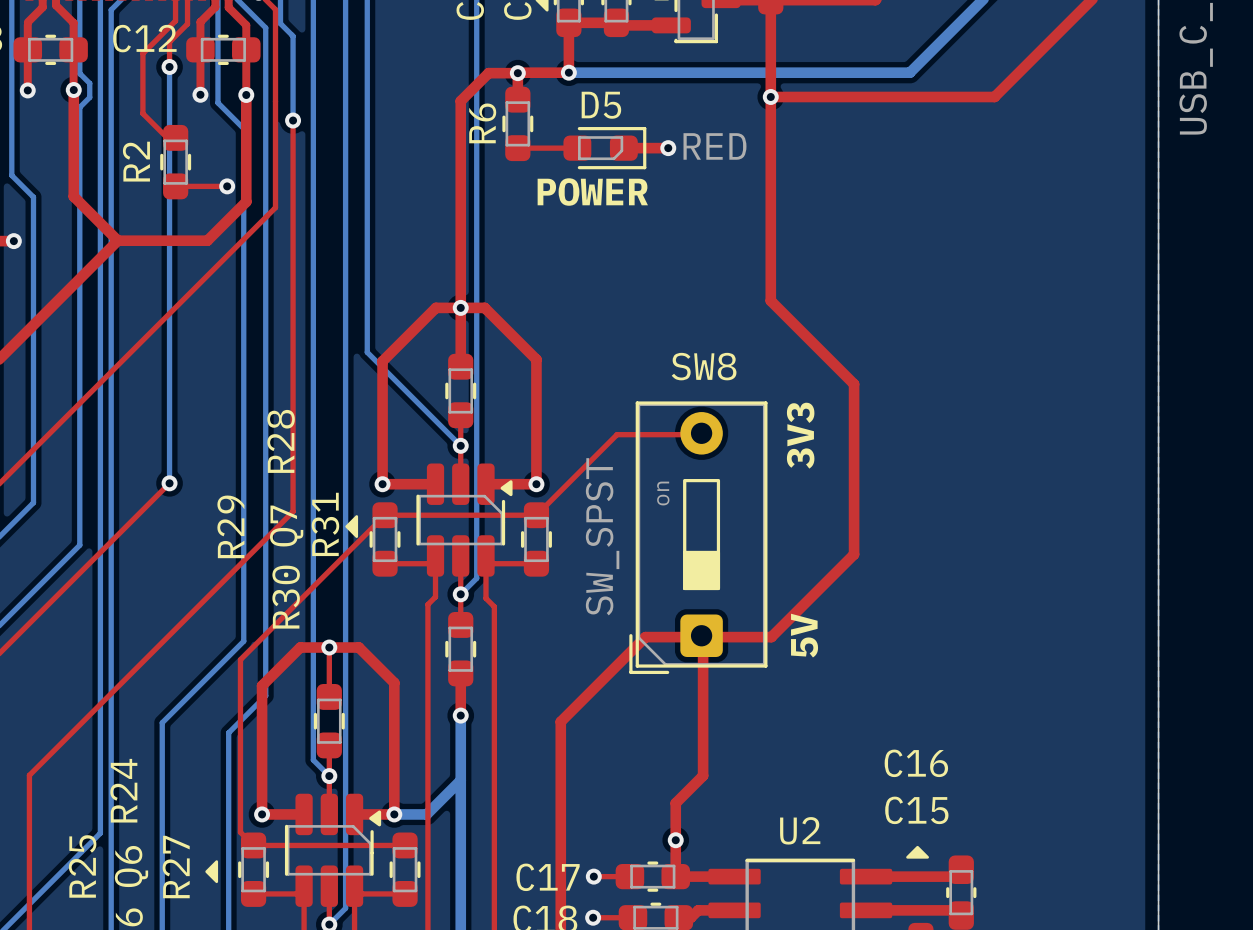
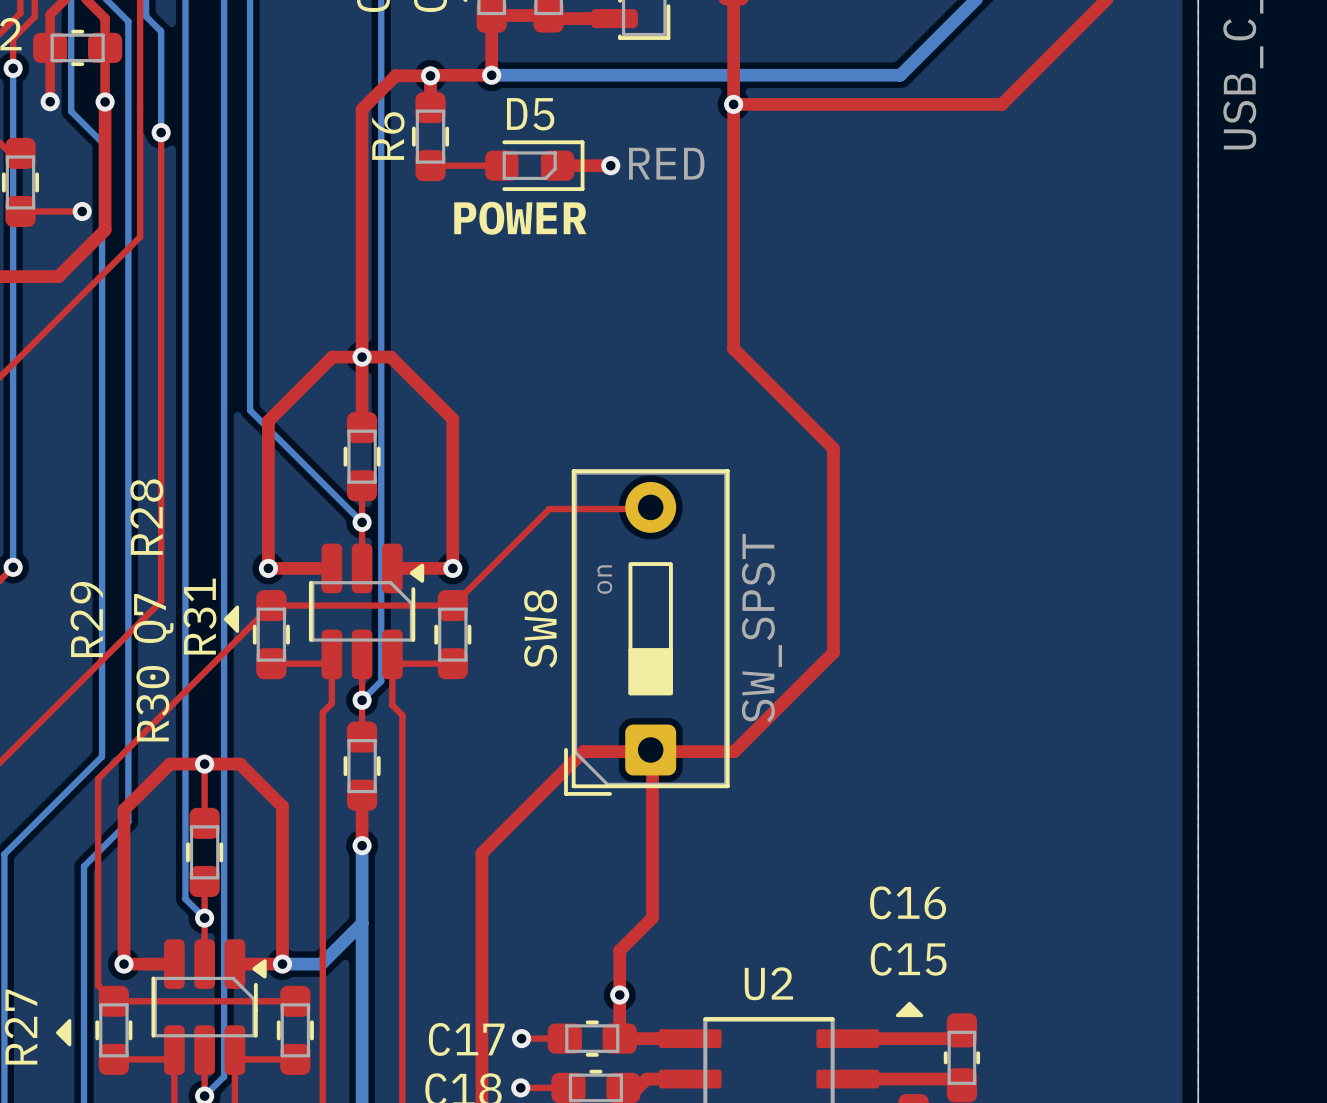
SW8 name rotation: 0° (704, 366) -> 90° counterclockwise (540, 628)
SW8 name position: SW8 (704, 366) -> SW8 (540, 628)
text: 3V3 (800, 435) -> none
SW8 value position: SW_SPST (602, 536) -> SW_SPST (761, 628)
text: 5V (804, 635) -> none

